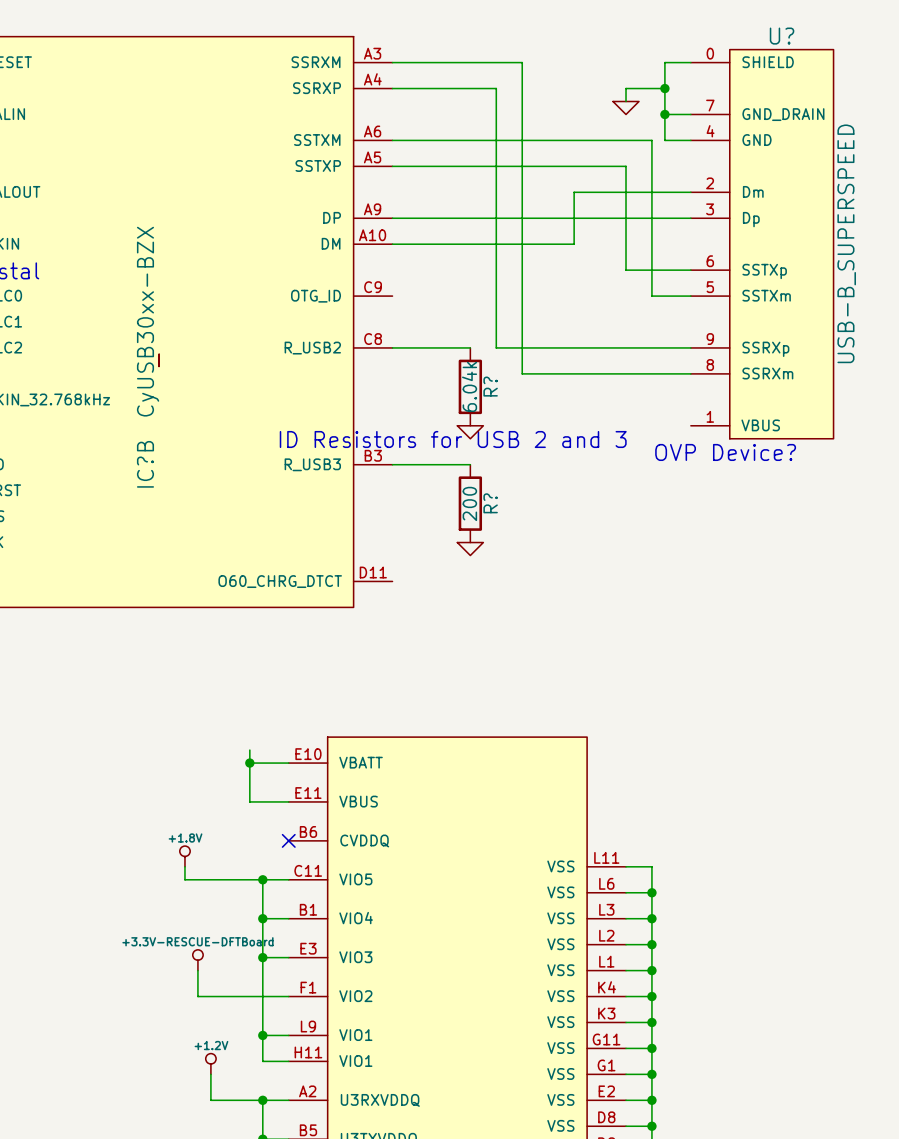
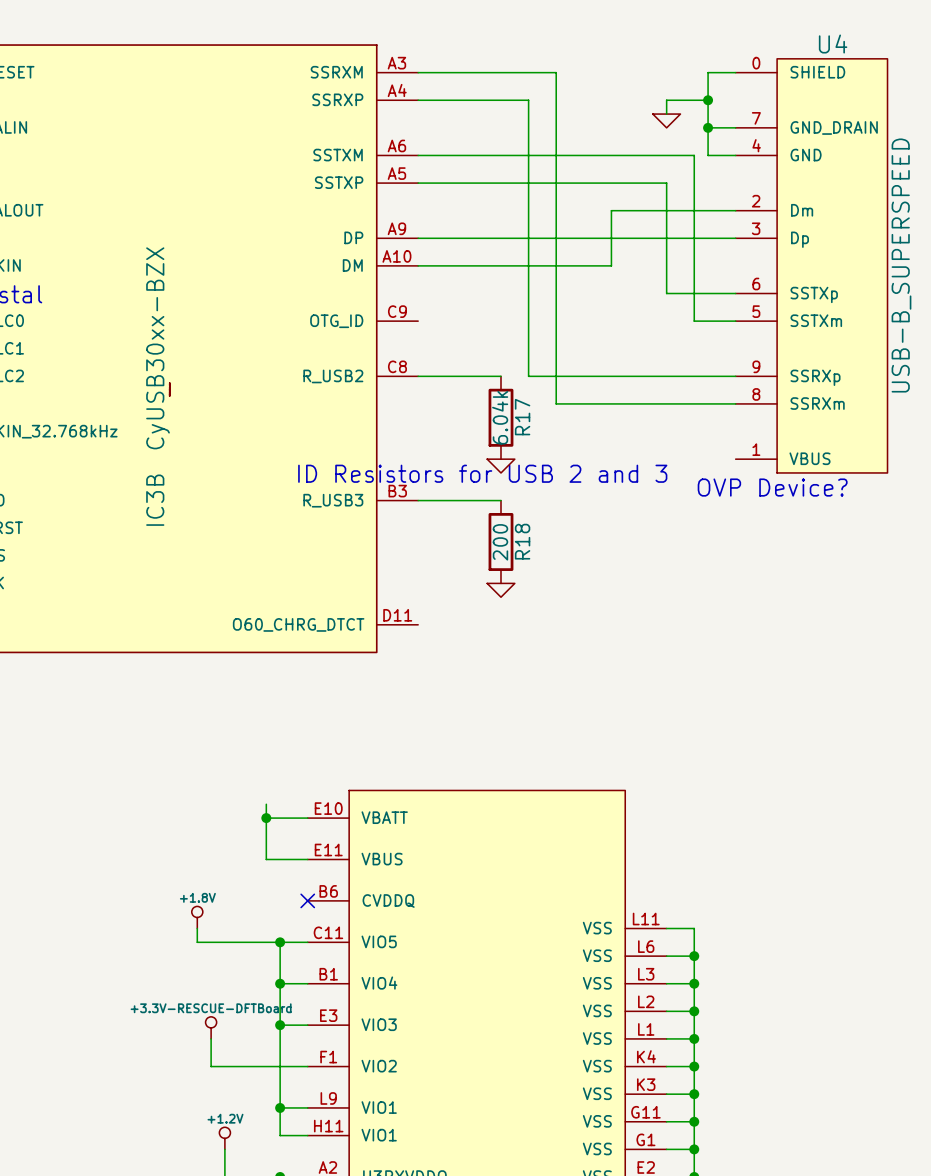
U? name: U? (782, 36) -> U4 (833, 44)
R? name: R? (490, 386) -> R17 (522, 417)
IC?B name: IC?B (145, 464) -> IC3B (155, 500)
R? name: R? (490, 503) -> R18 (522, 541)

